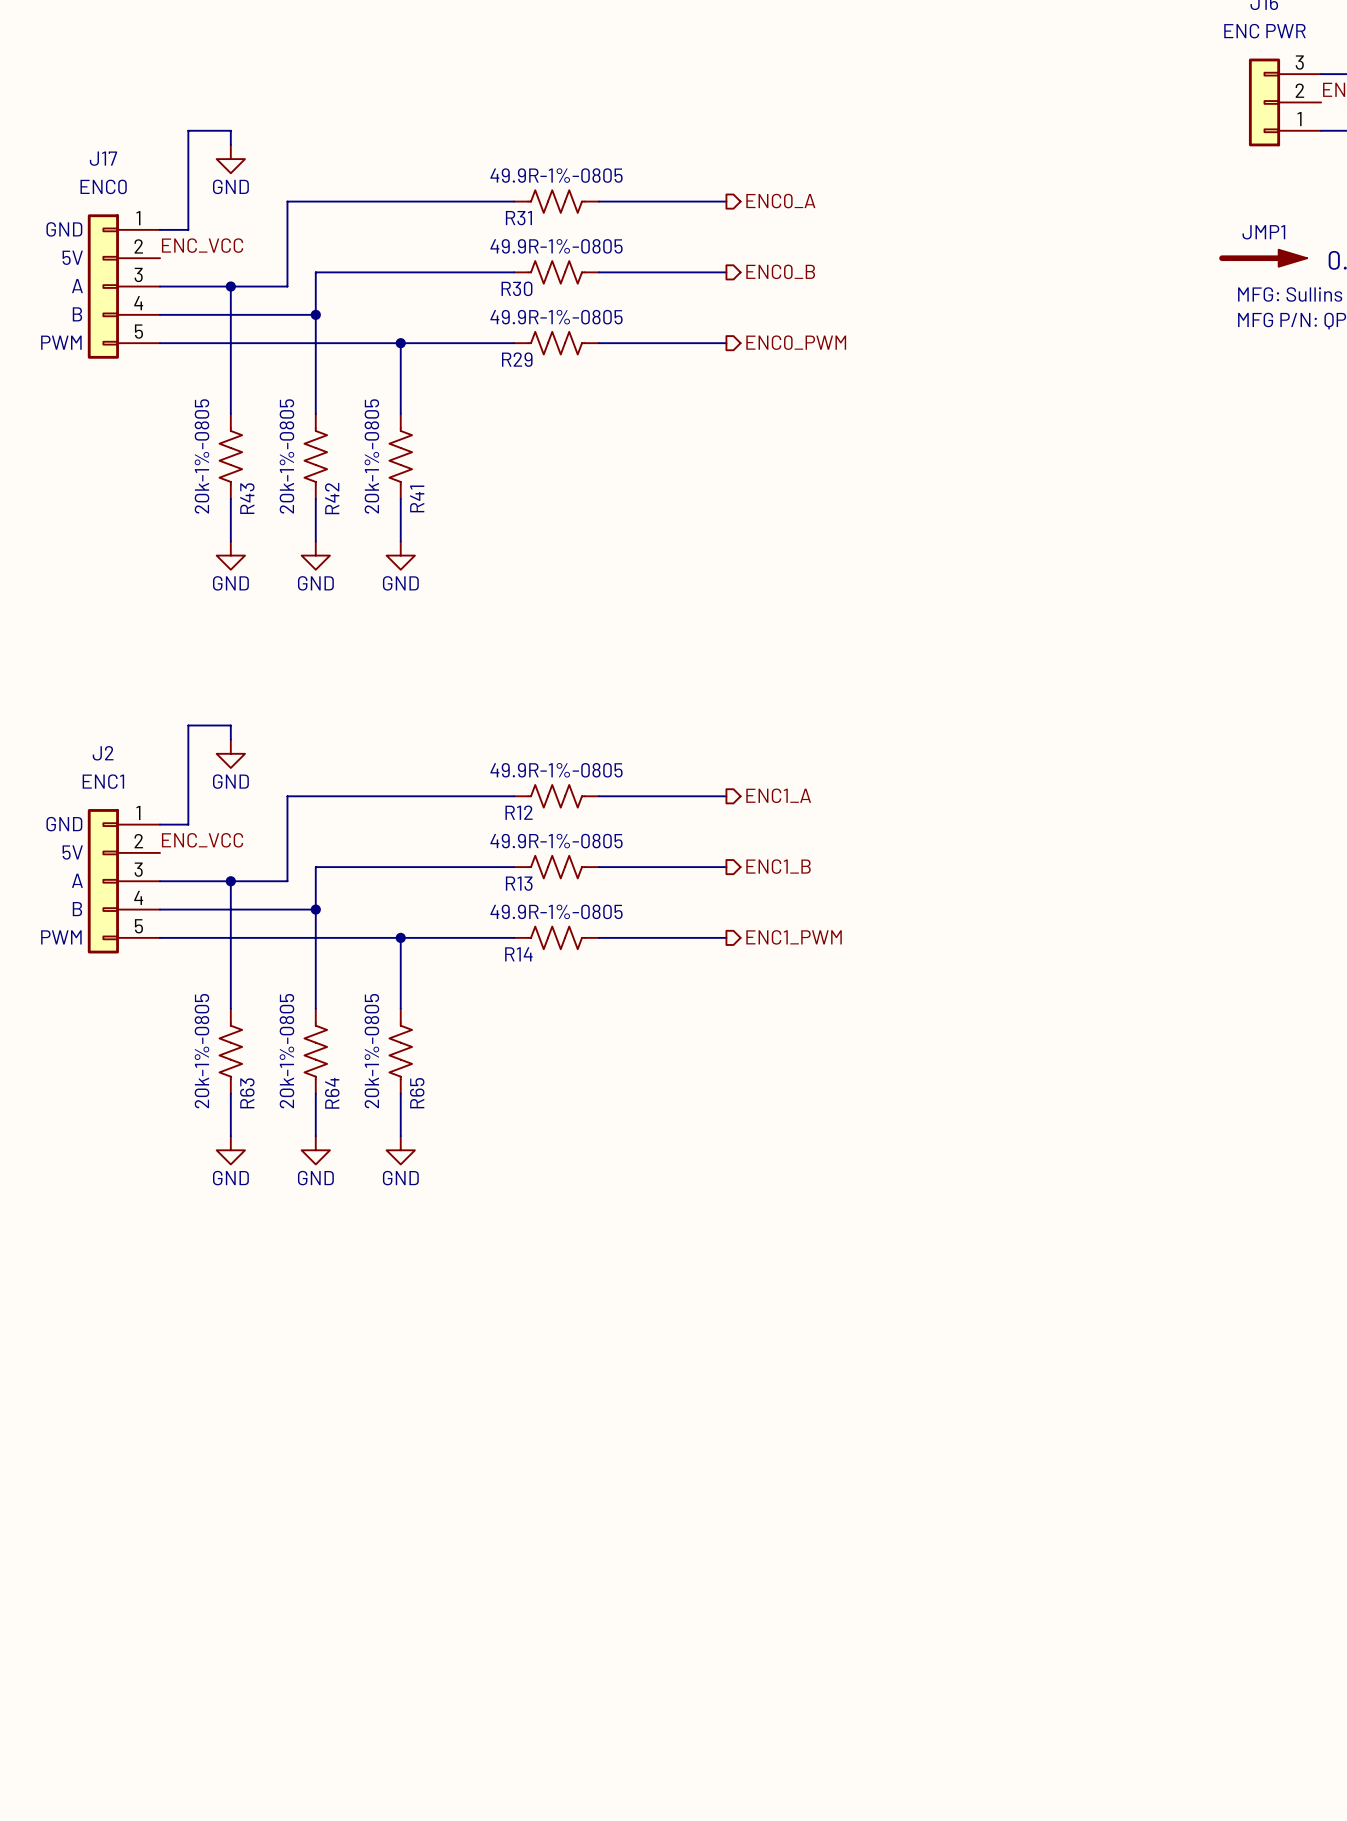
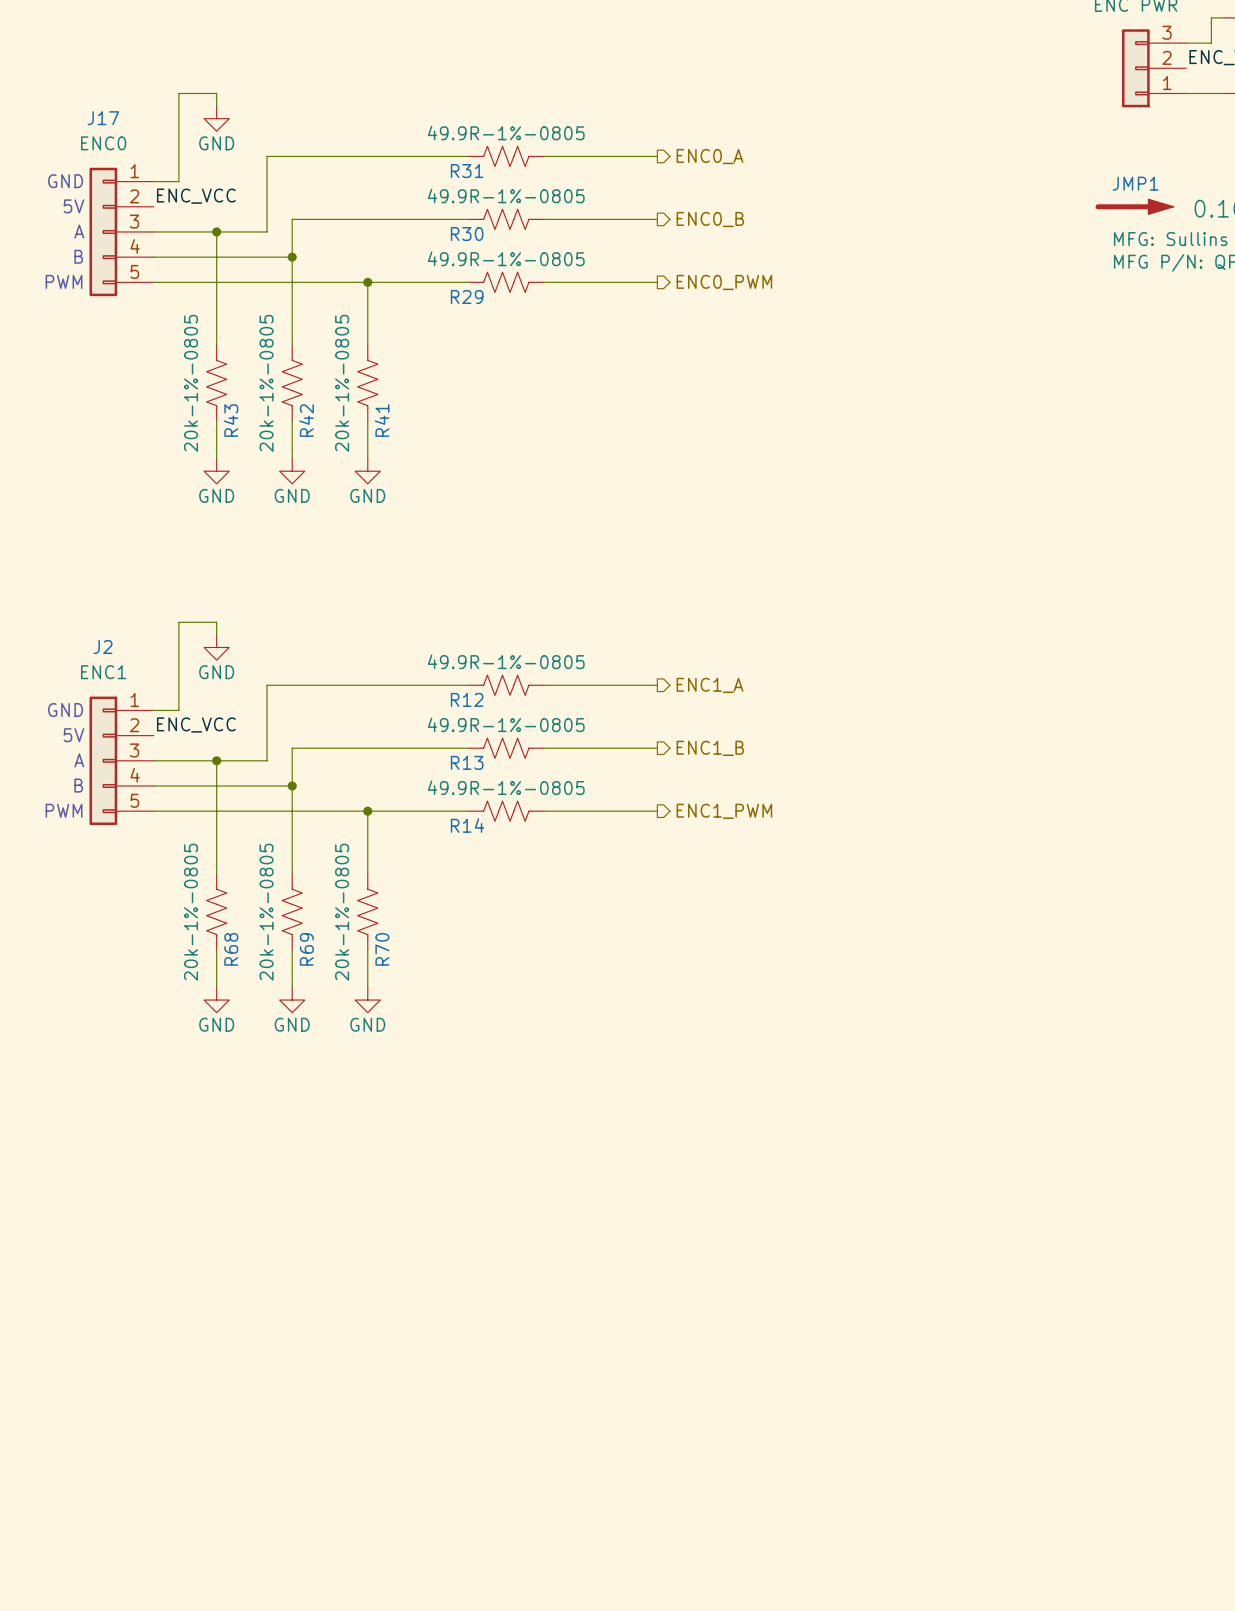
R63 name: R63 (247, 1093) -> R68 (231, 949)
R64 name: R64 (332, 1093) -> R69 (306, 949)
R65 name: R65 (417, 1093) -> R70 (382, 949)

